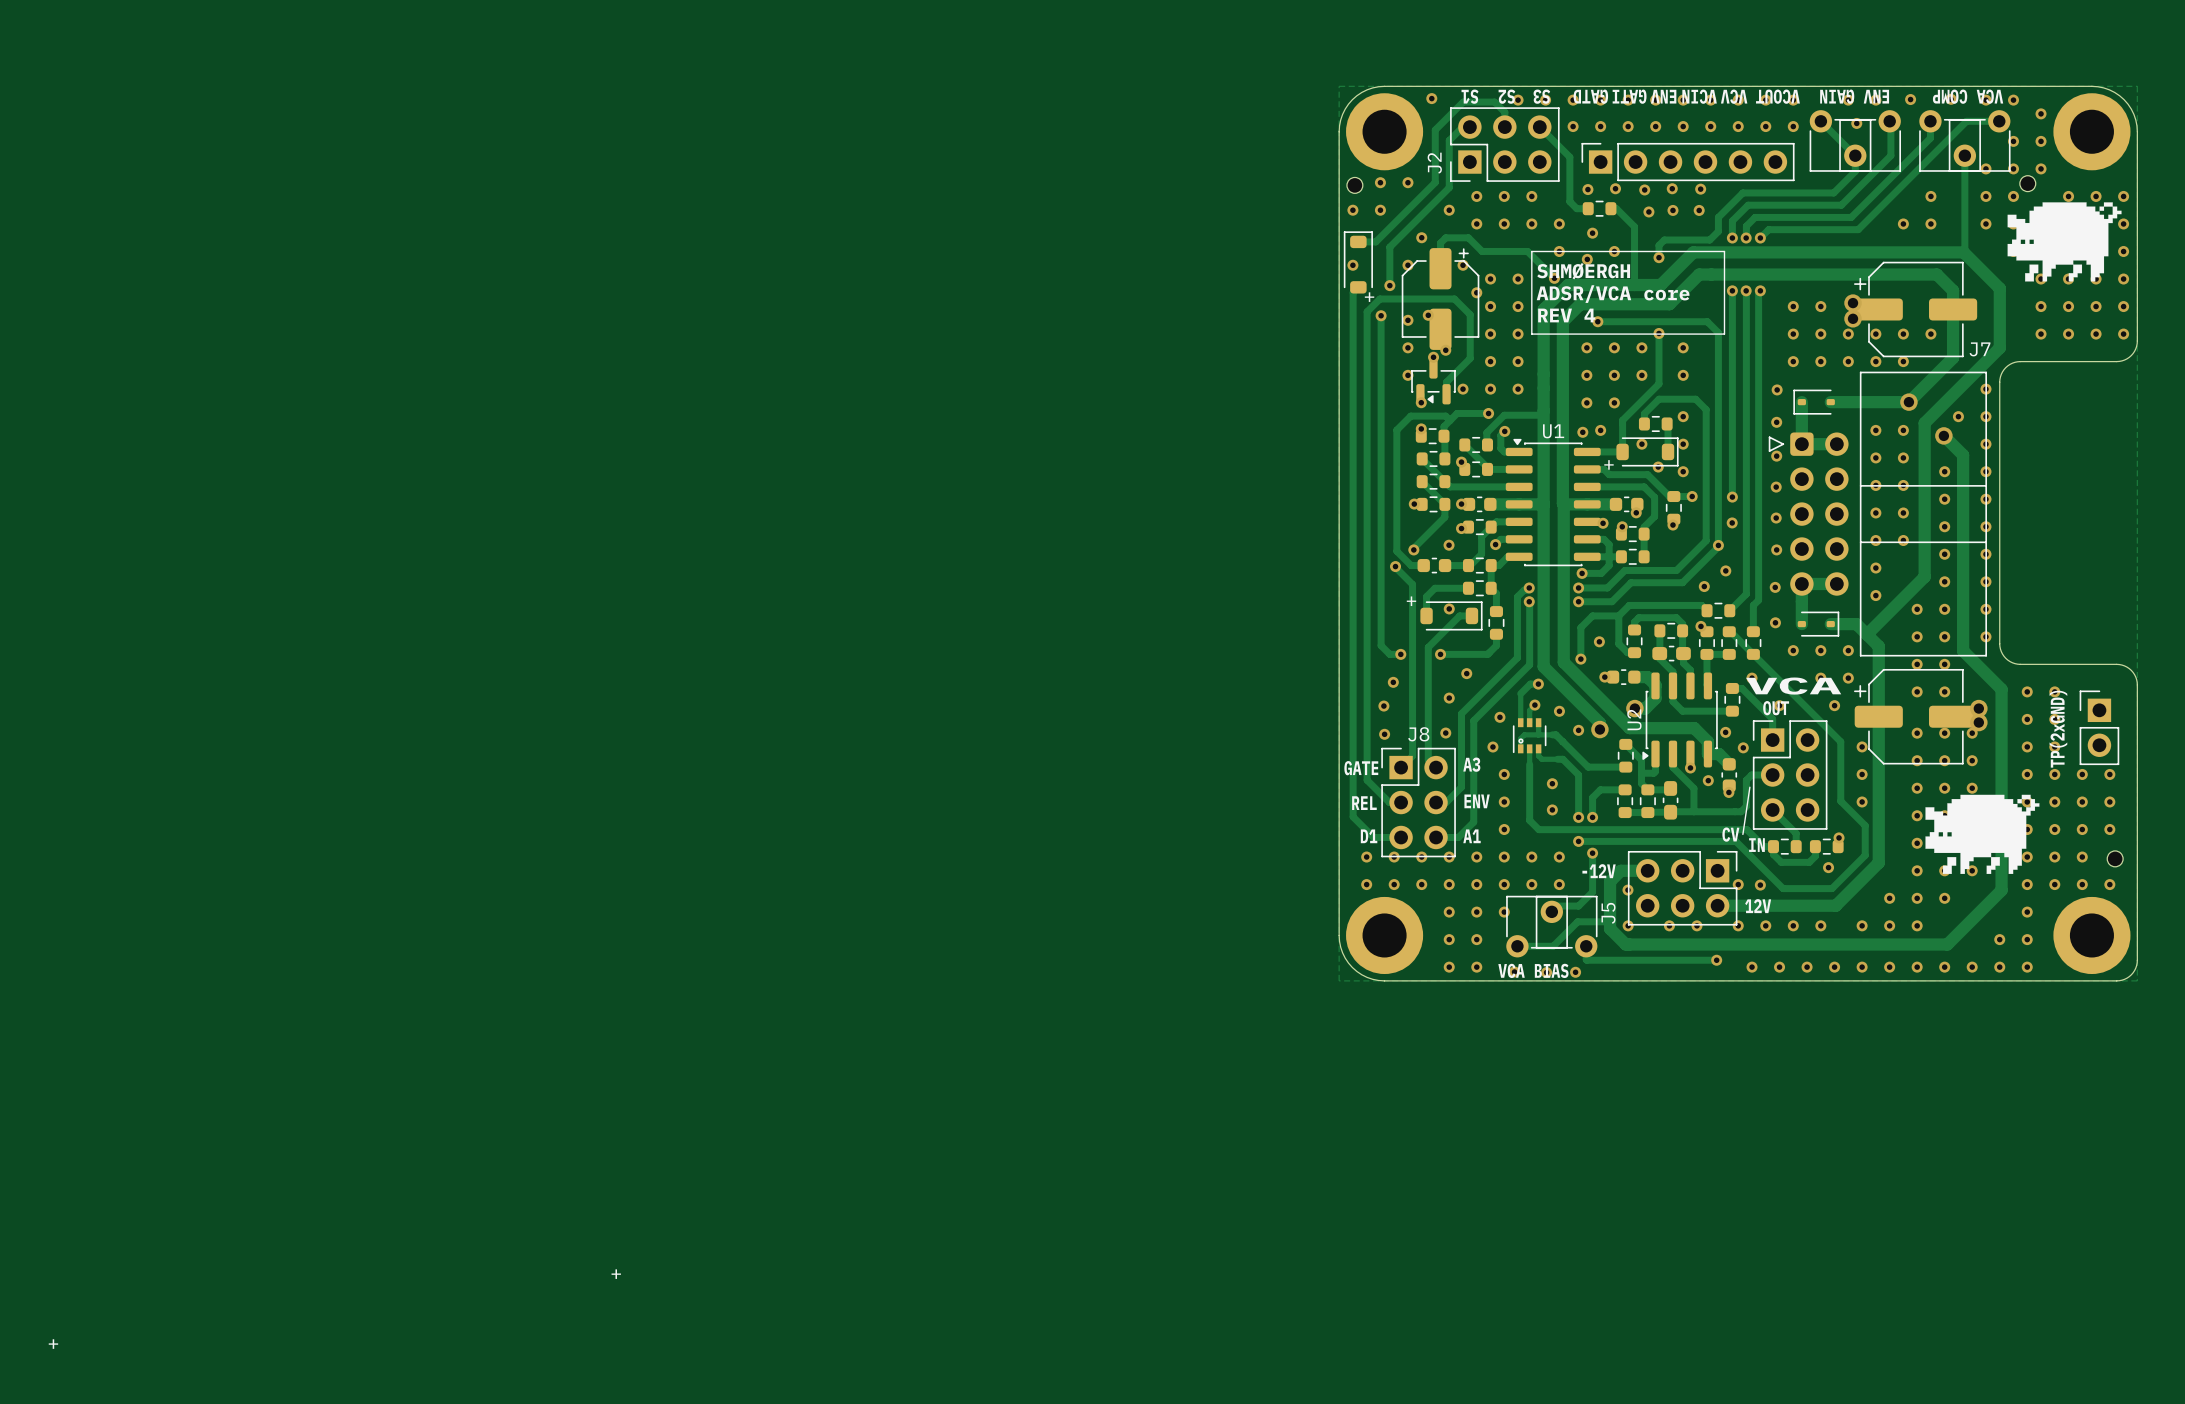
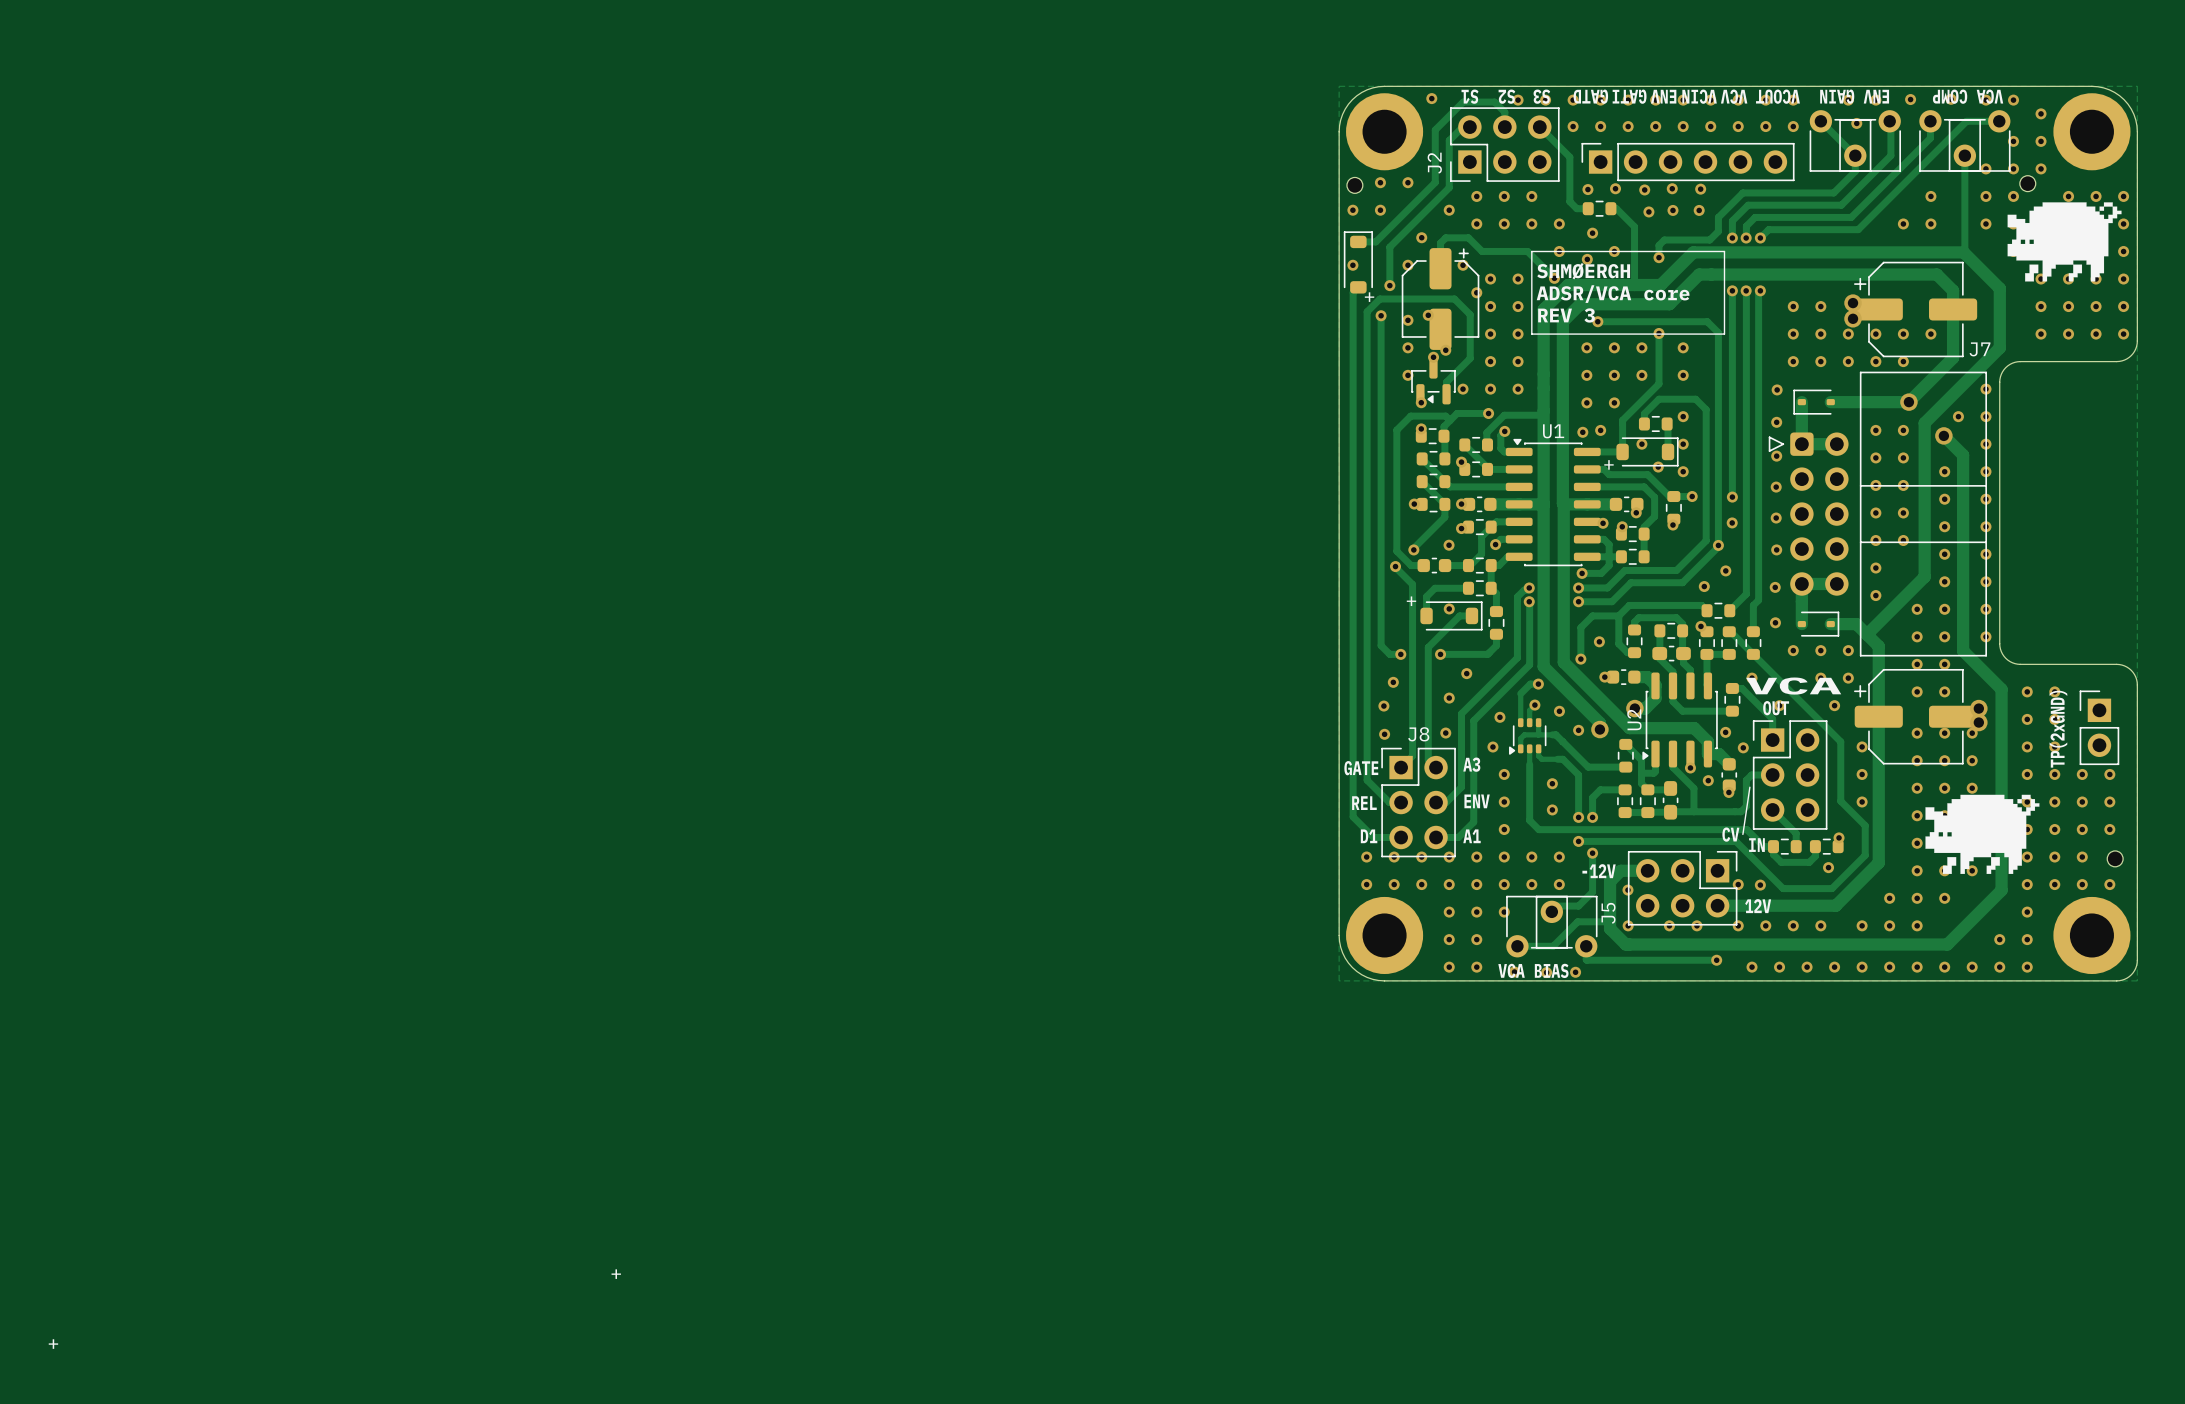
text: REV 4 (1566, 315) -> REV 3 (1566, 315)
part footprint: [1512, 718, 1547, 754] -> [1509, 718, 1547, 755]

